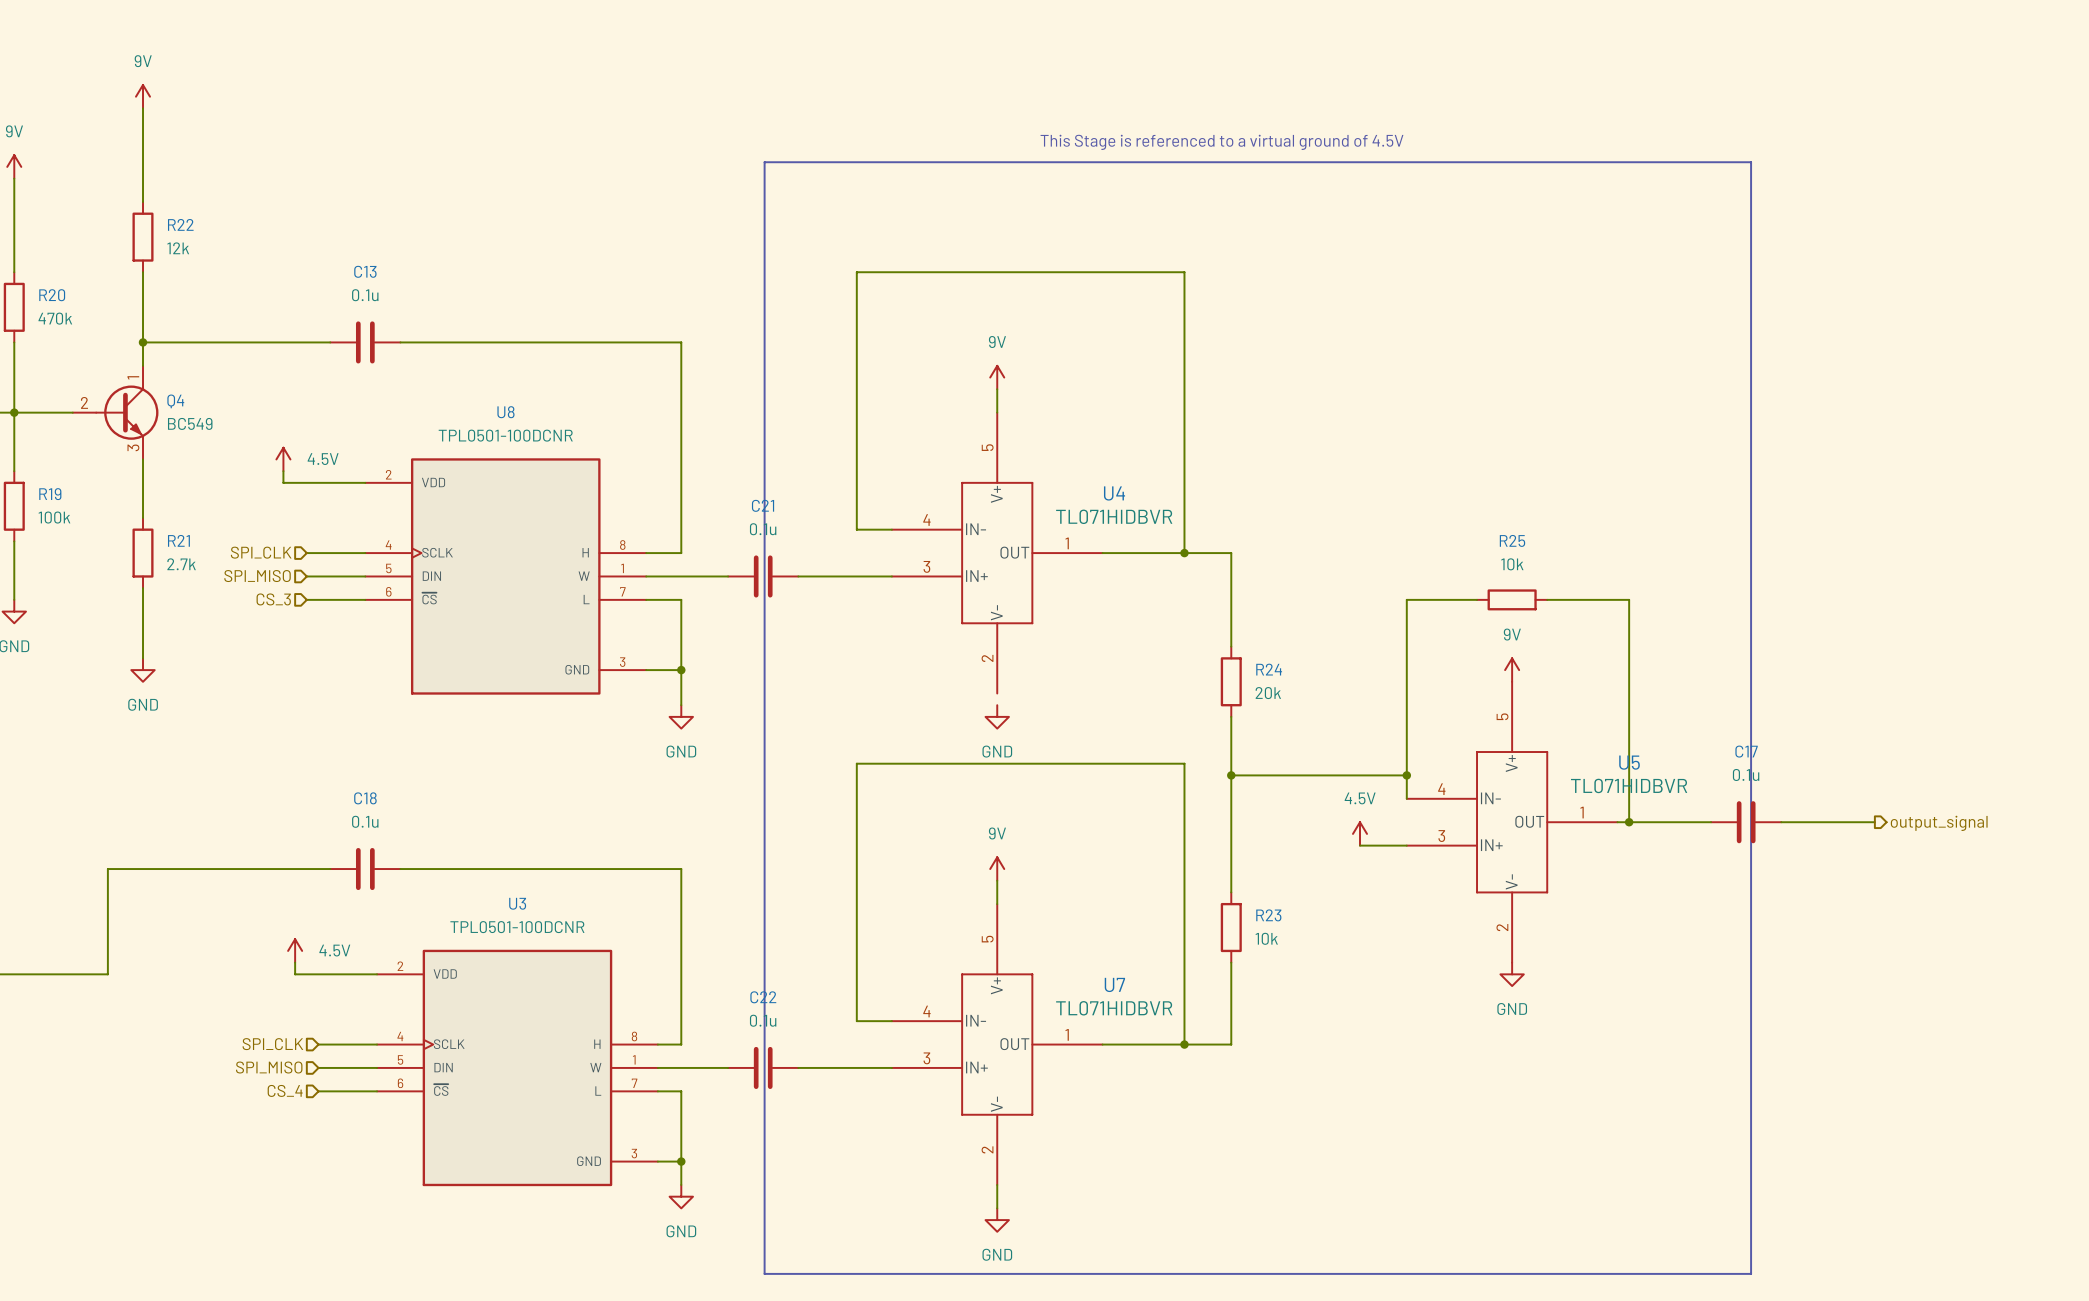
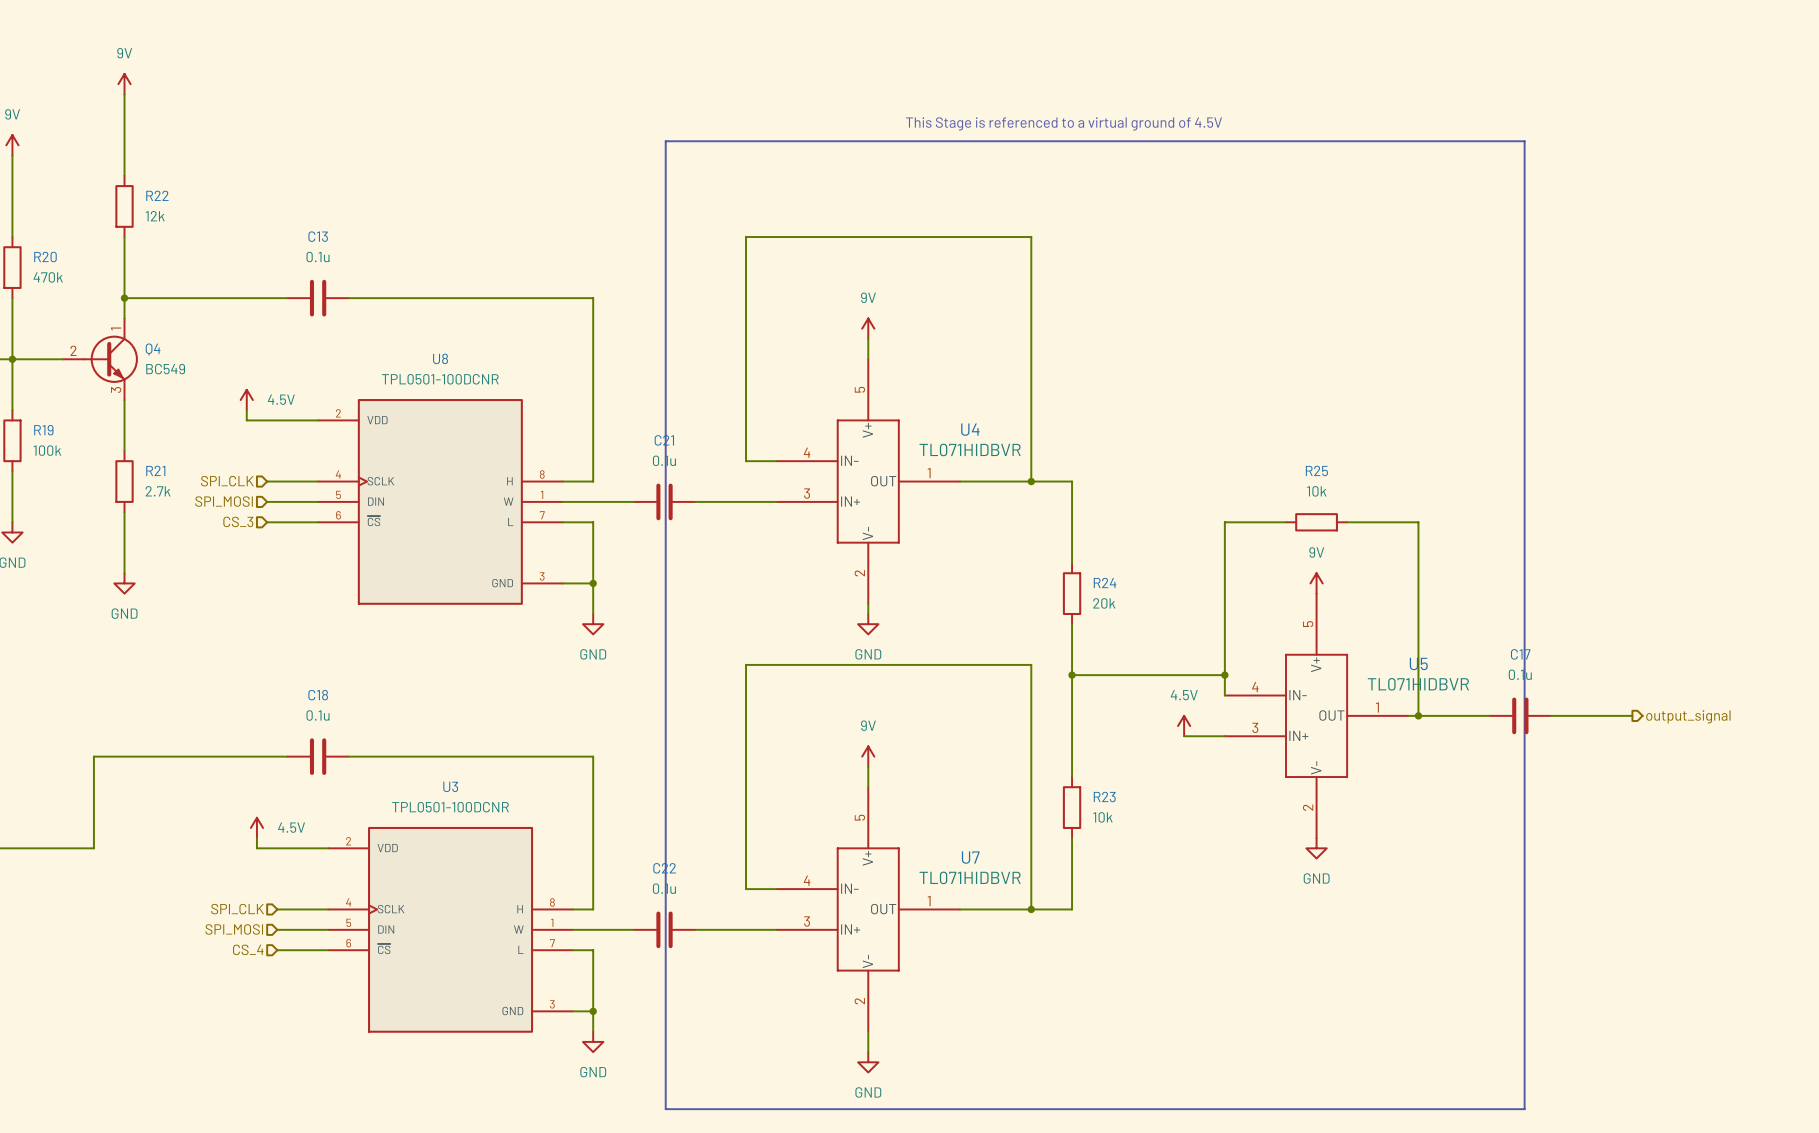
hierarchical label: SPI_MISO (257, 576) -> SPI_MOSI (224, 501)
wire: none -> (868, 603) (868, 613)
hierarchical label: SPI_MISO (269, 1067) -> SPI_MOSI (234, 929)

